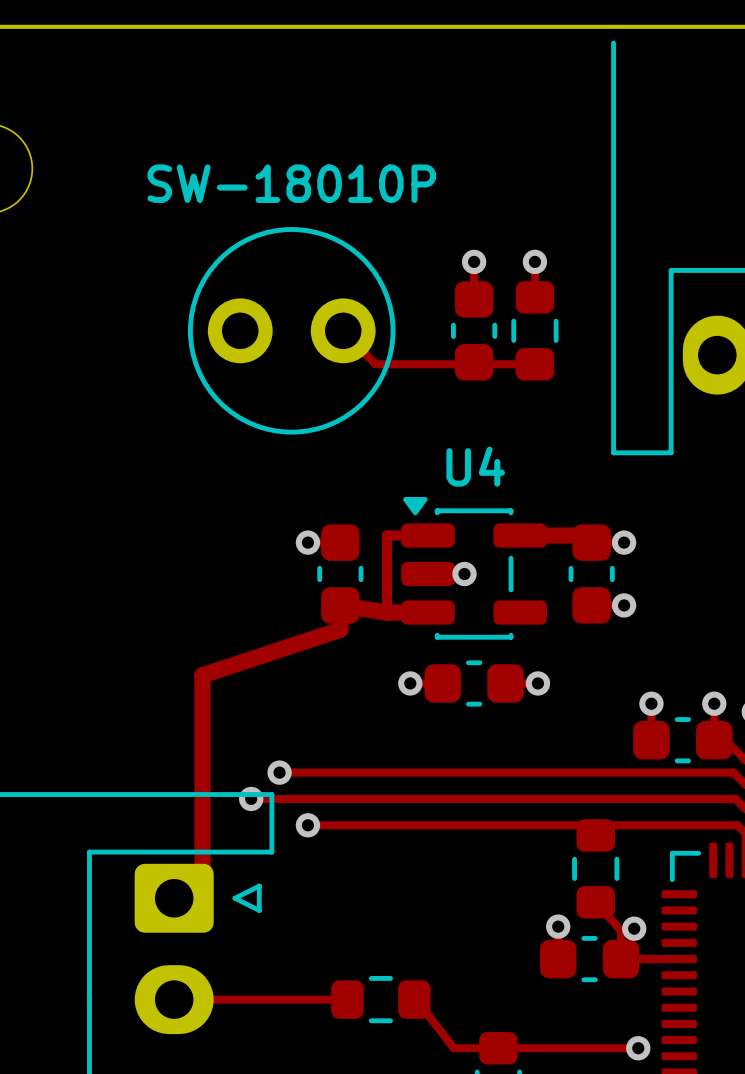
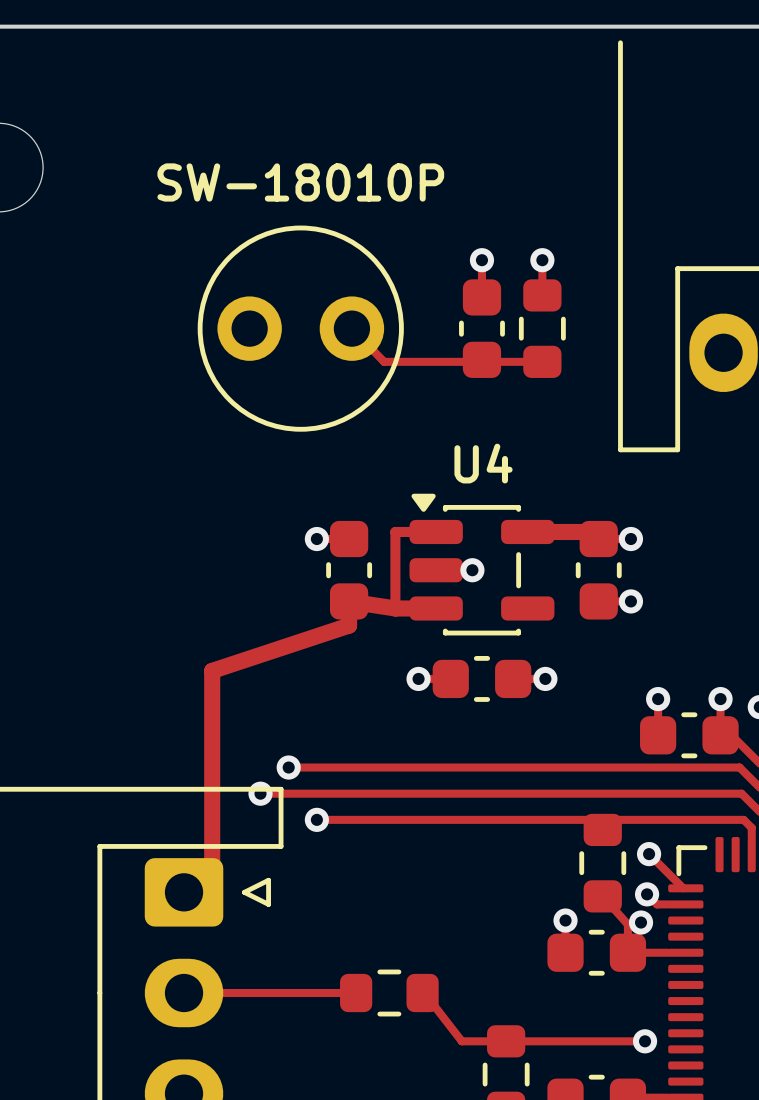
track: none -> (649, 854) (683, 888)
via: none -> (649, 854)
track: none -> (647, 894) (657, 904) (668, 904)
via: none -> (647, 894)

